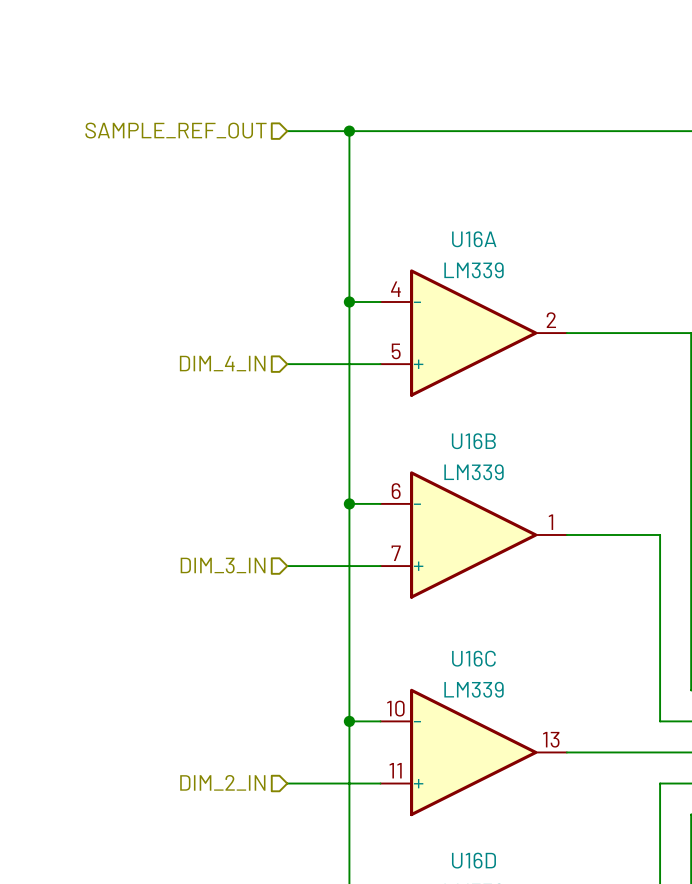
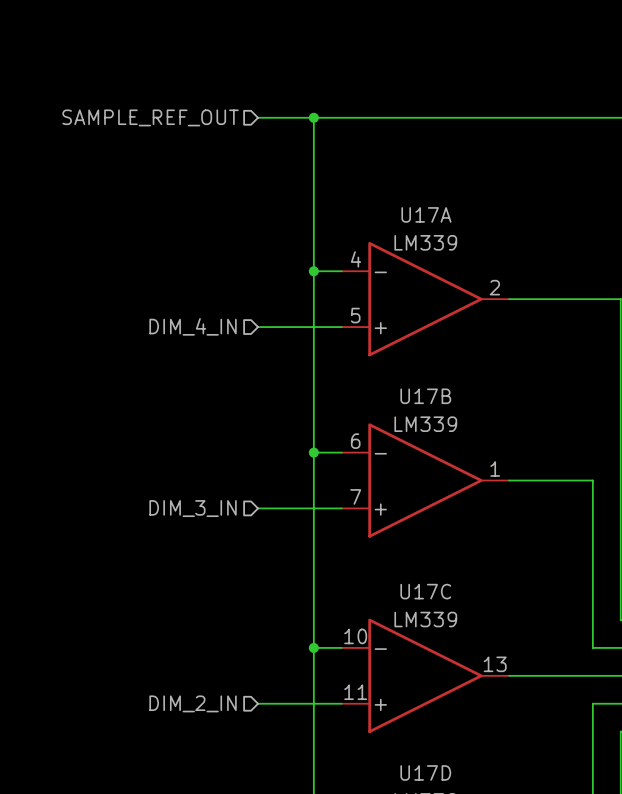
U16A name: U16A (474, 239) -> U17A (426, 214)
U16B name: U16B (473, 441) -> U17B (425, 396)
U16C name: U16C (473, 658) -> U17C (425, 591)
U16D name: U16D (473, 860) -> U17D (425, 772)

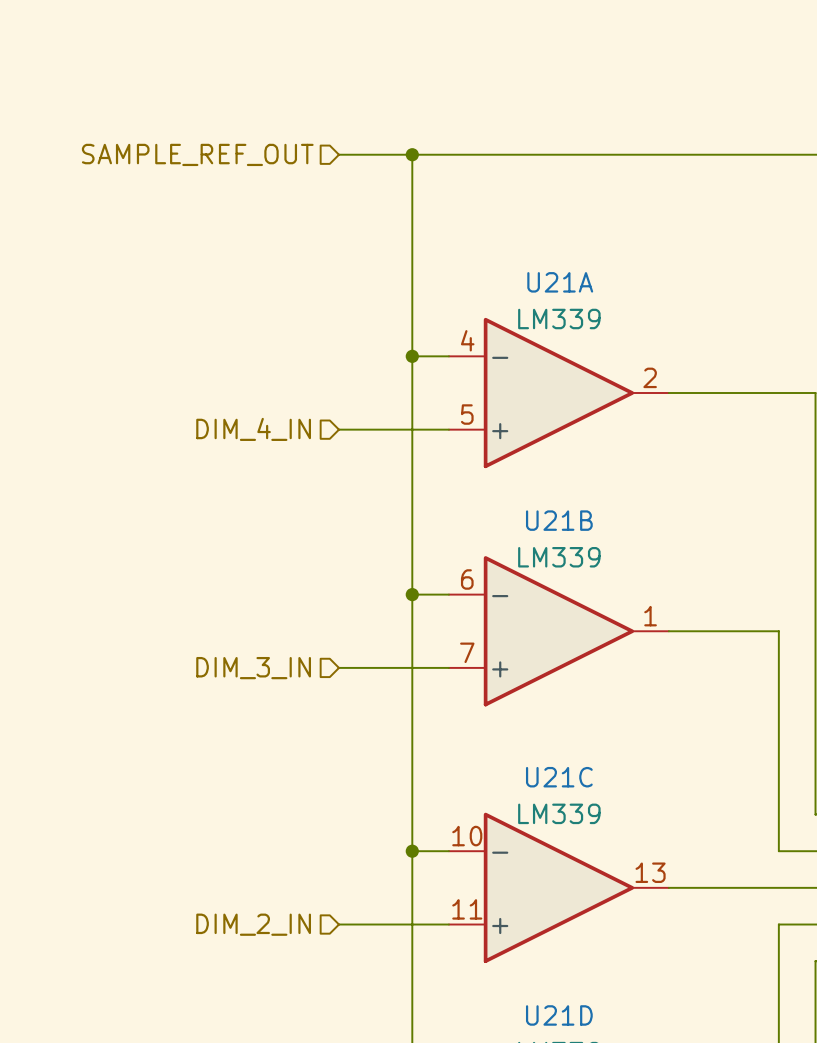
U17A name: U17A (426, 214) -> U21A (560, 282)
U17B name: U17B (425, 396) -> U21B (559, 520)
U17C name: U17C (425, 591) -> U21C (559, 777)
U17D name: U17D (425, 772) -> U21D (559, 1015)

